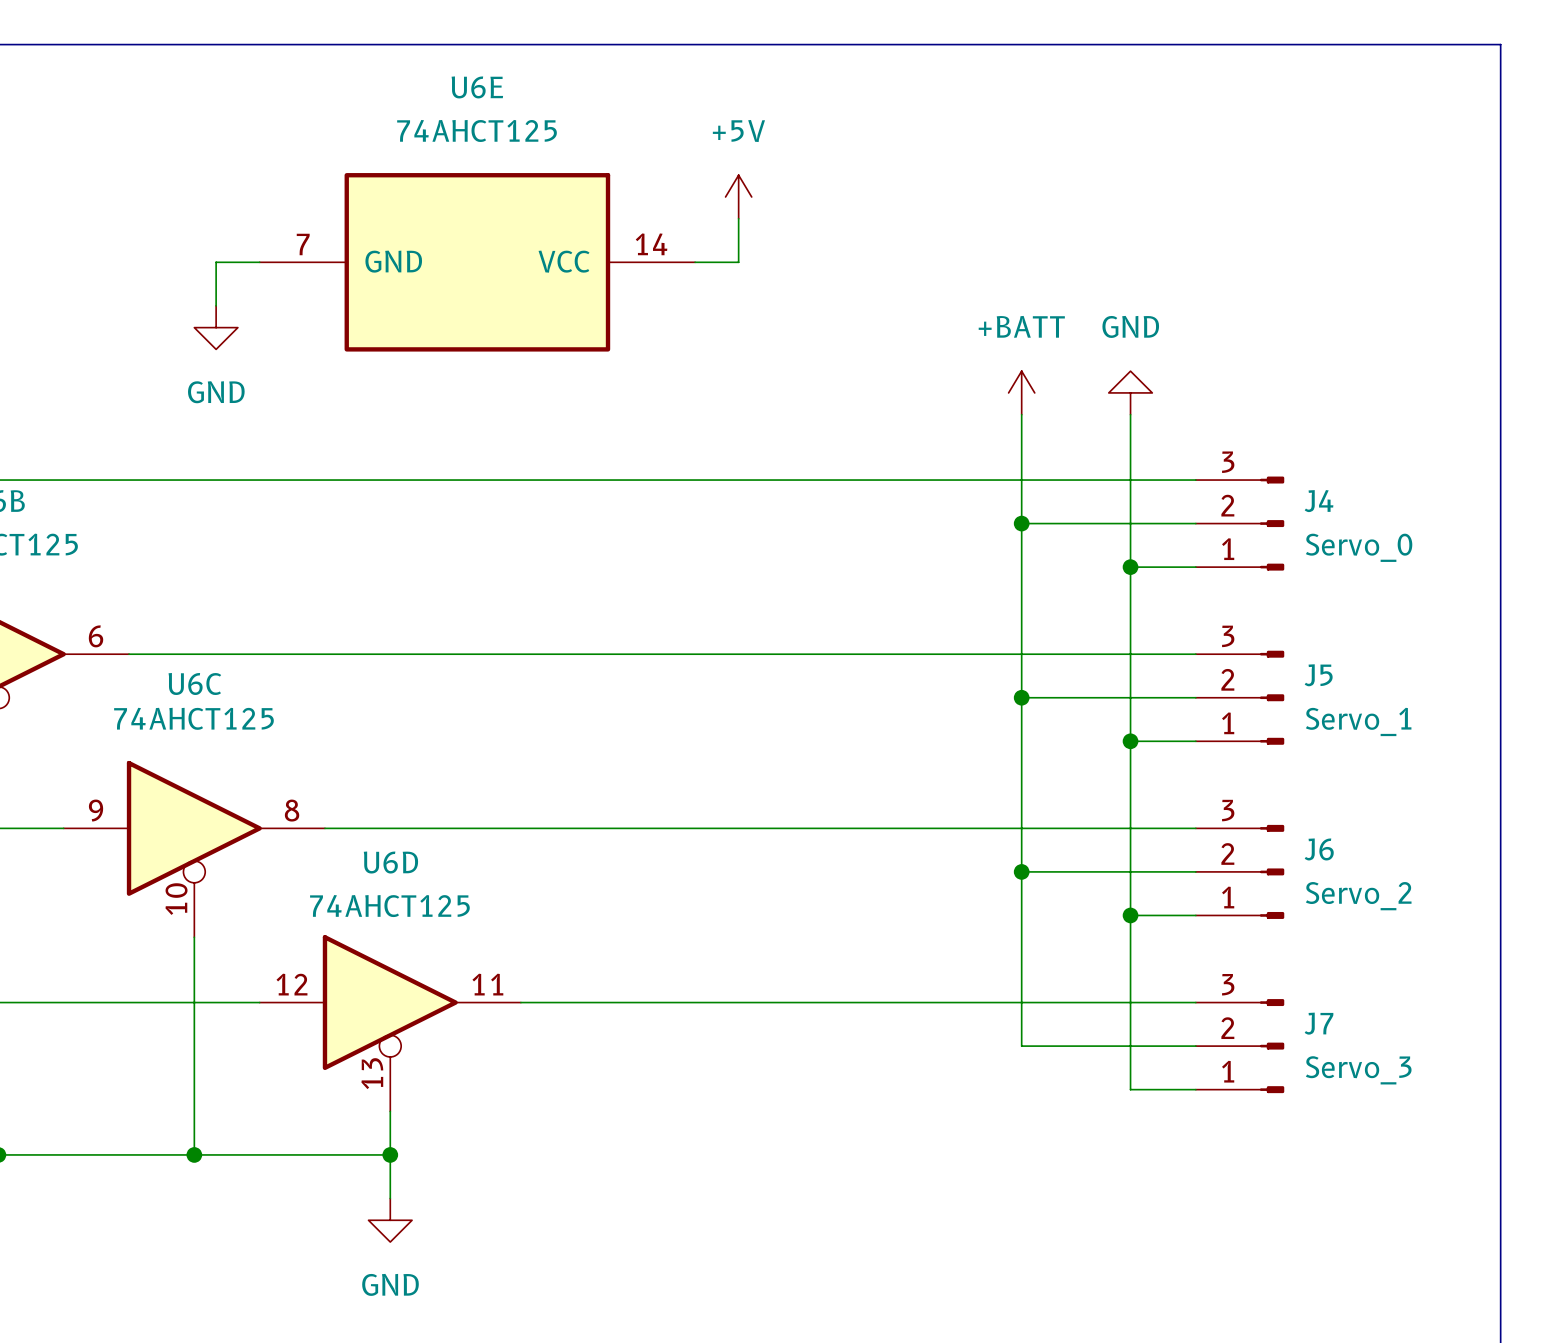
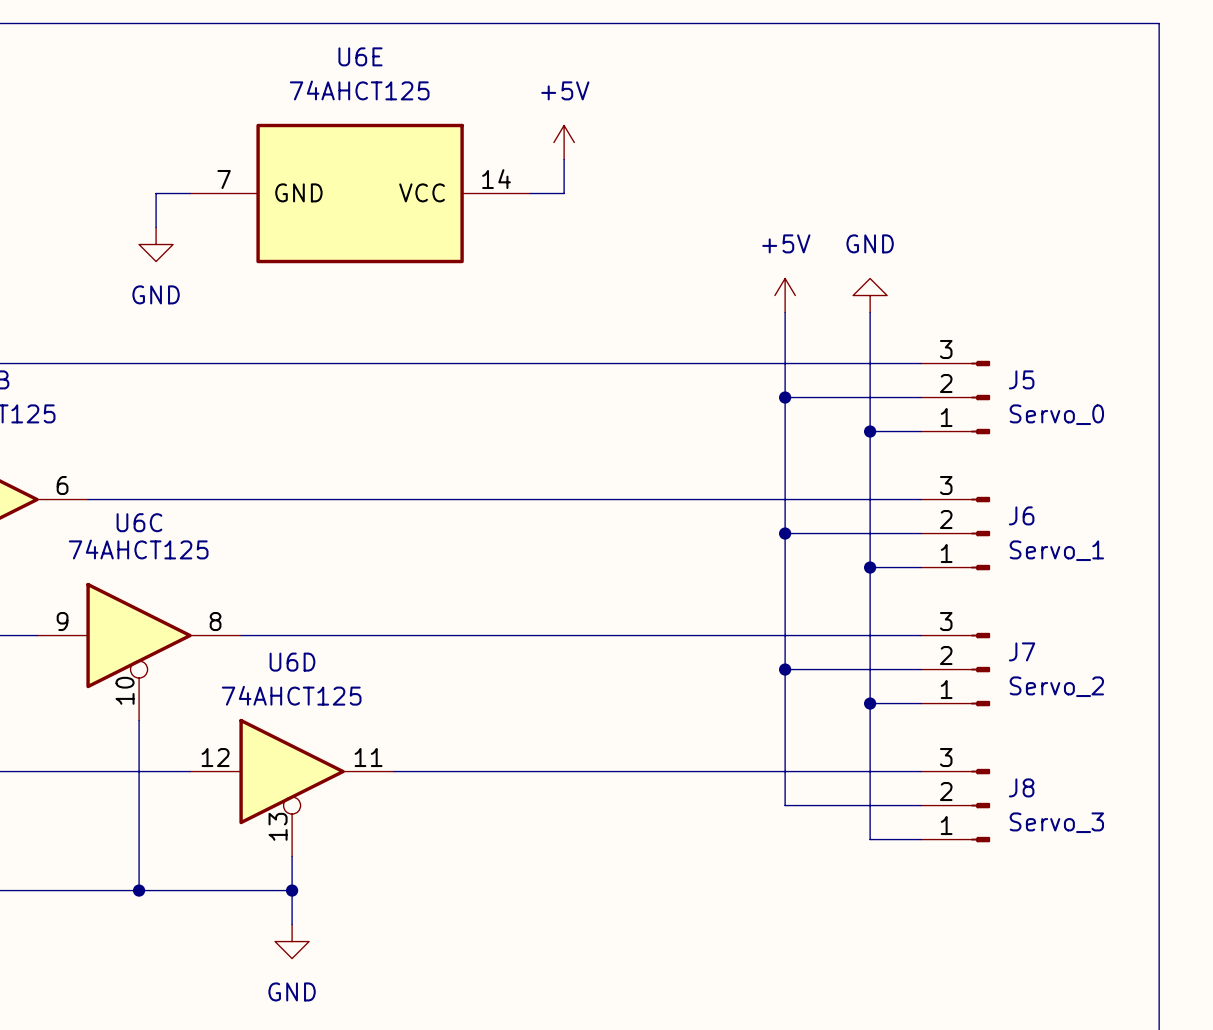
power symbol: +BATT (1021, 392) -> +5V (785, 295)
J4 name: J4 (1319, 501) -> J5 (1021, 379)
J5 name: J5 (1318, 675) -> J6 (1021, 515)
J6 name: J6 (1319, 849) -> J7 (1022, 651)
J7 name: J7 (1319, 1023) -> J8 (1021, 787)

